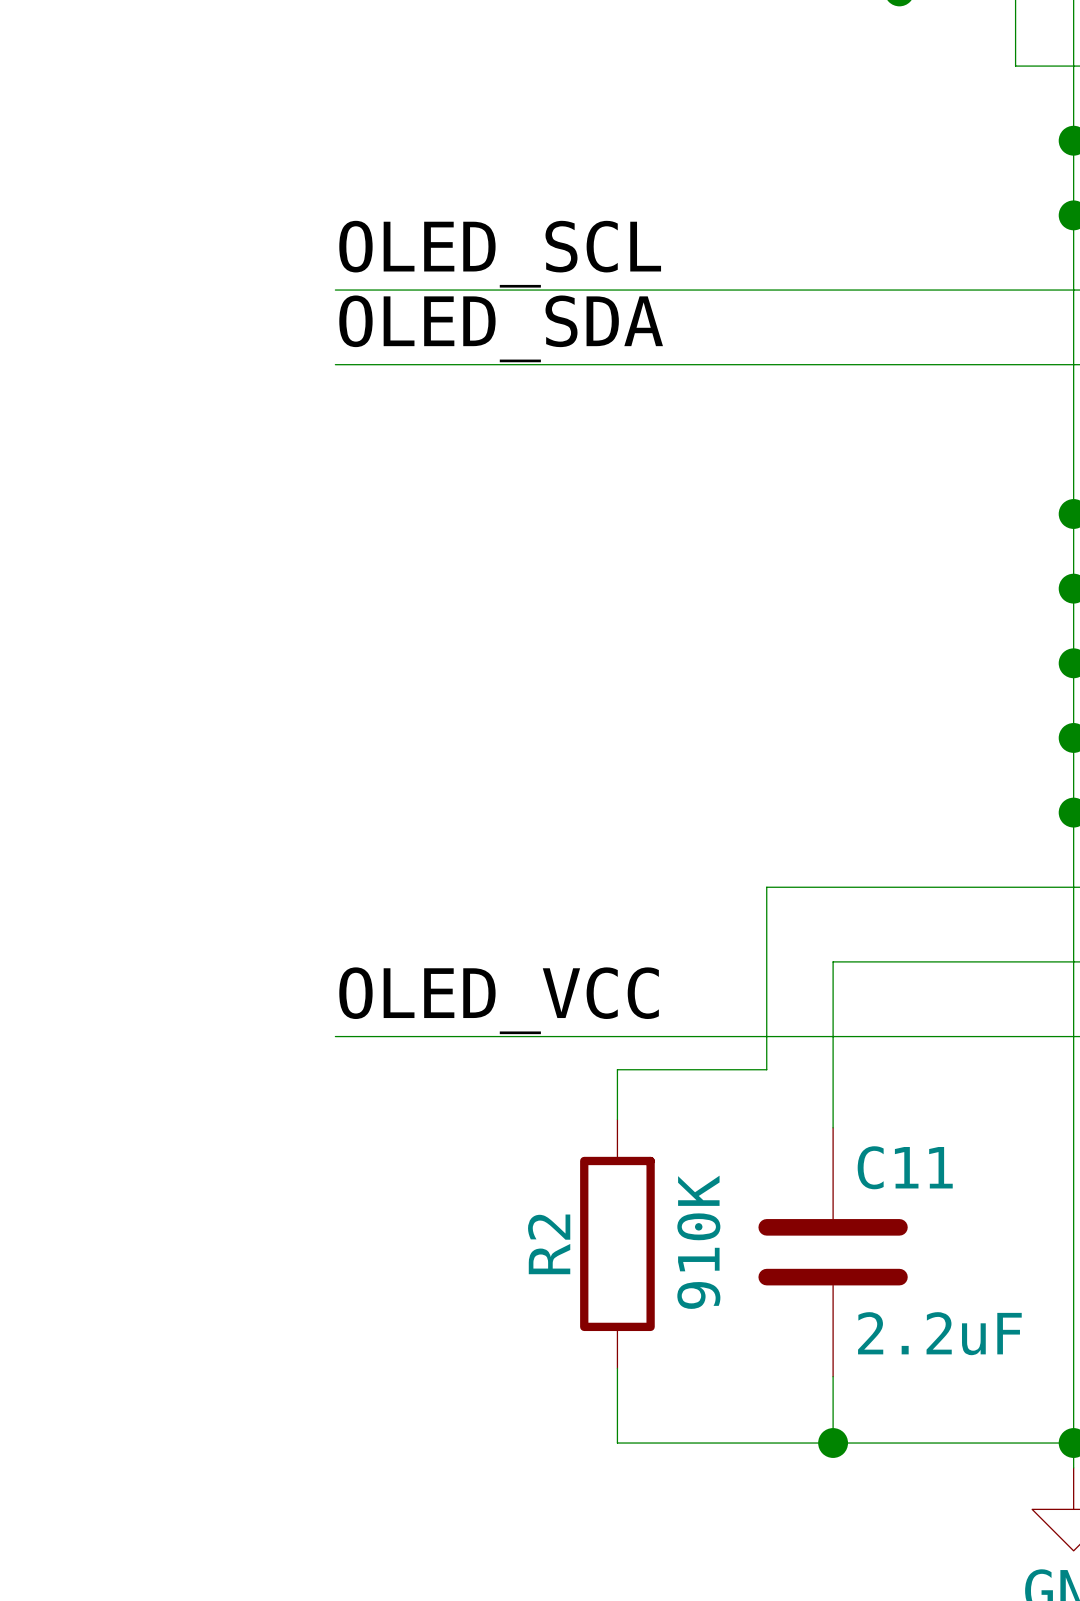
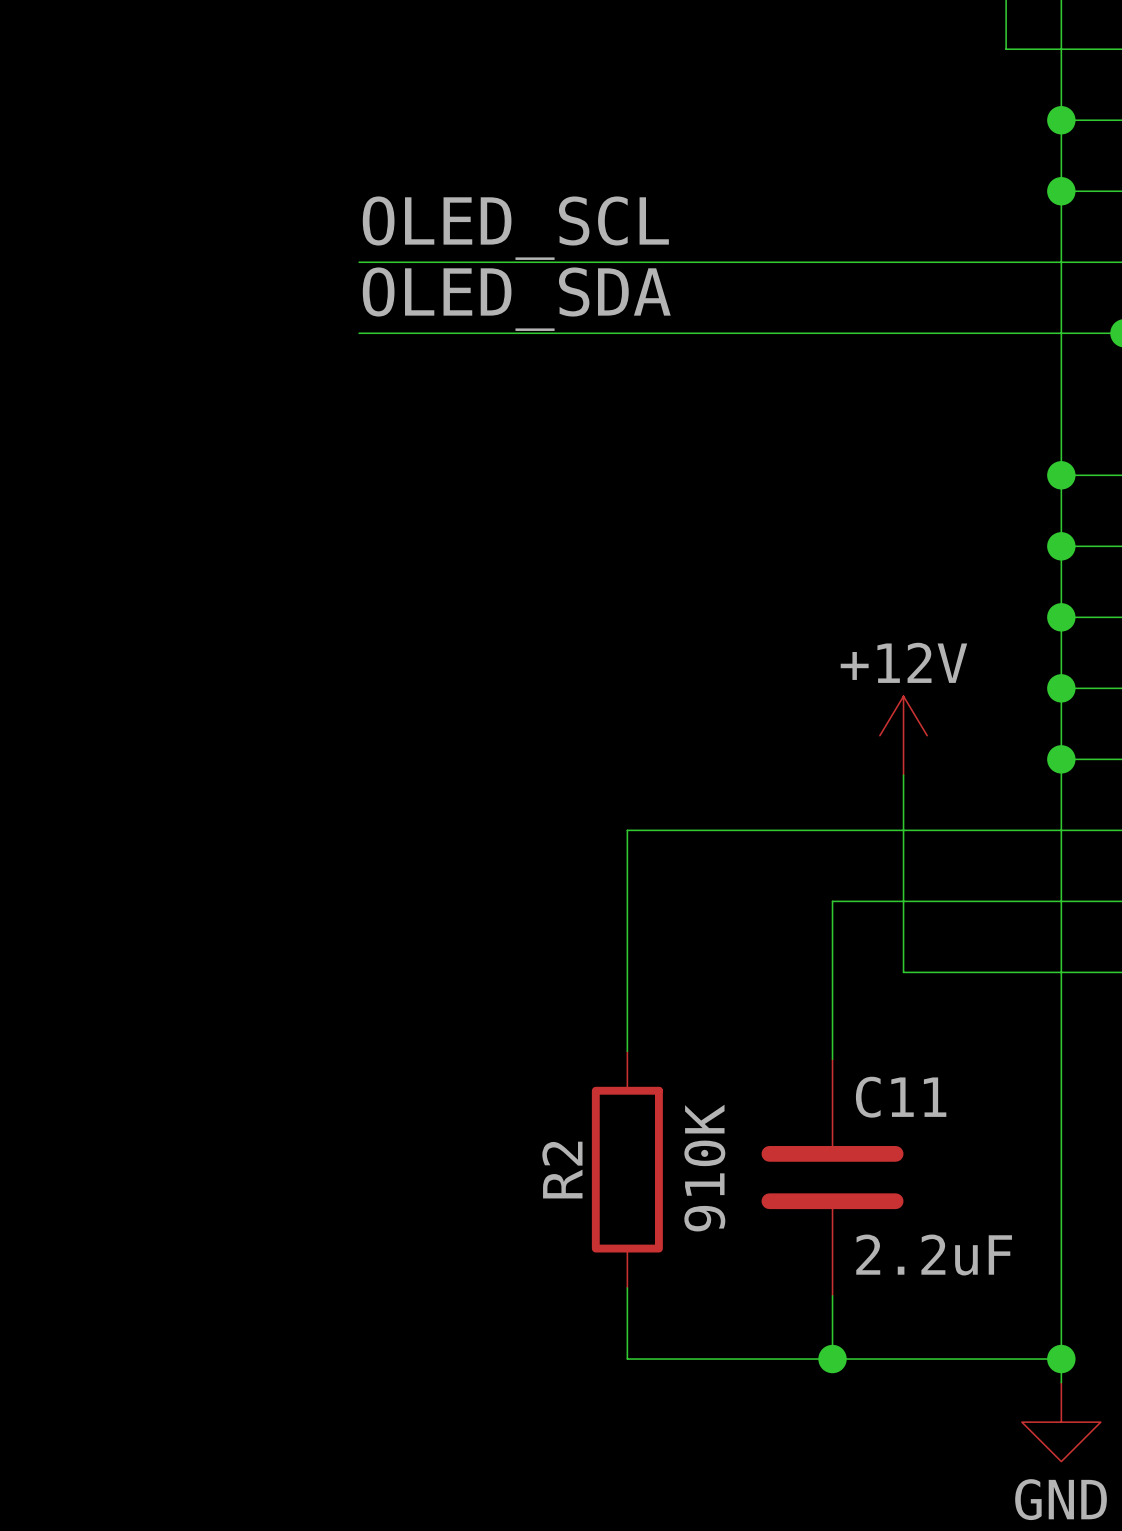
power symbol: none -> +12V (903, 735)
wire: (766, 887) (766, 1069) (617, 1069) -> (769, 830) (627, 830) (627, 1003)
label: OLED_VCC (499, 1000) -> none
wire: (335, 1036) (907, 1036) -> (903, 775) (903, 972)

